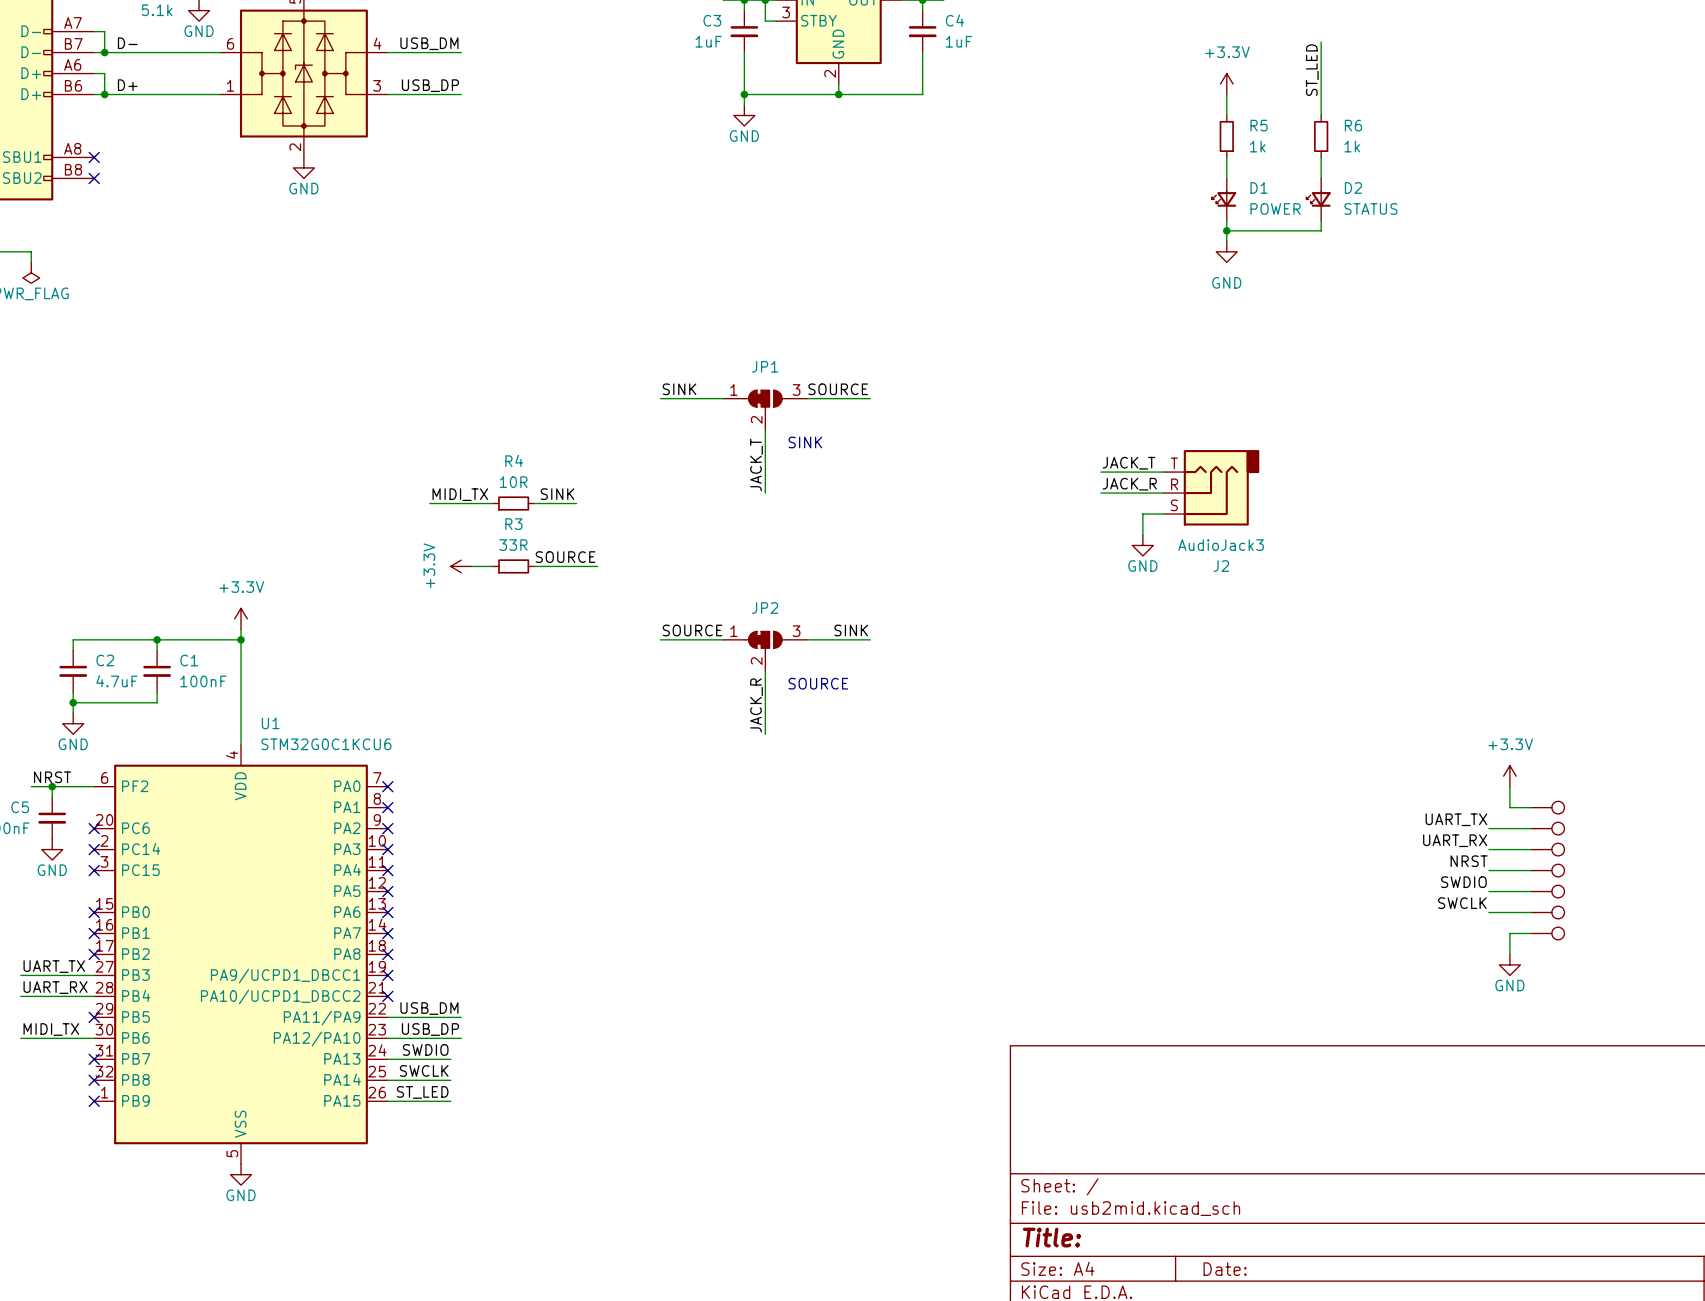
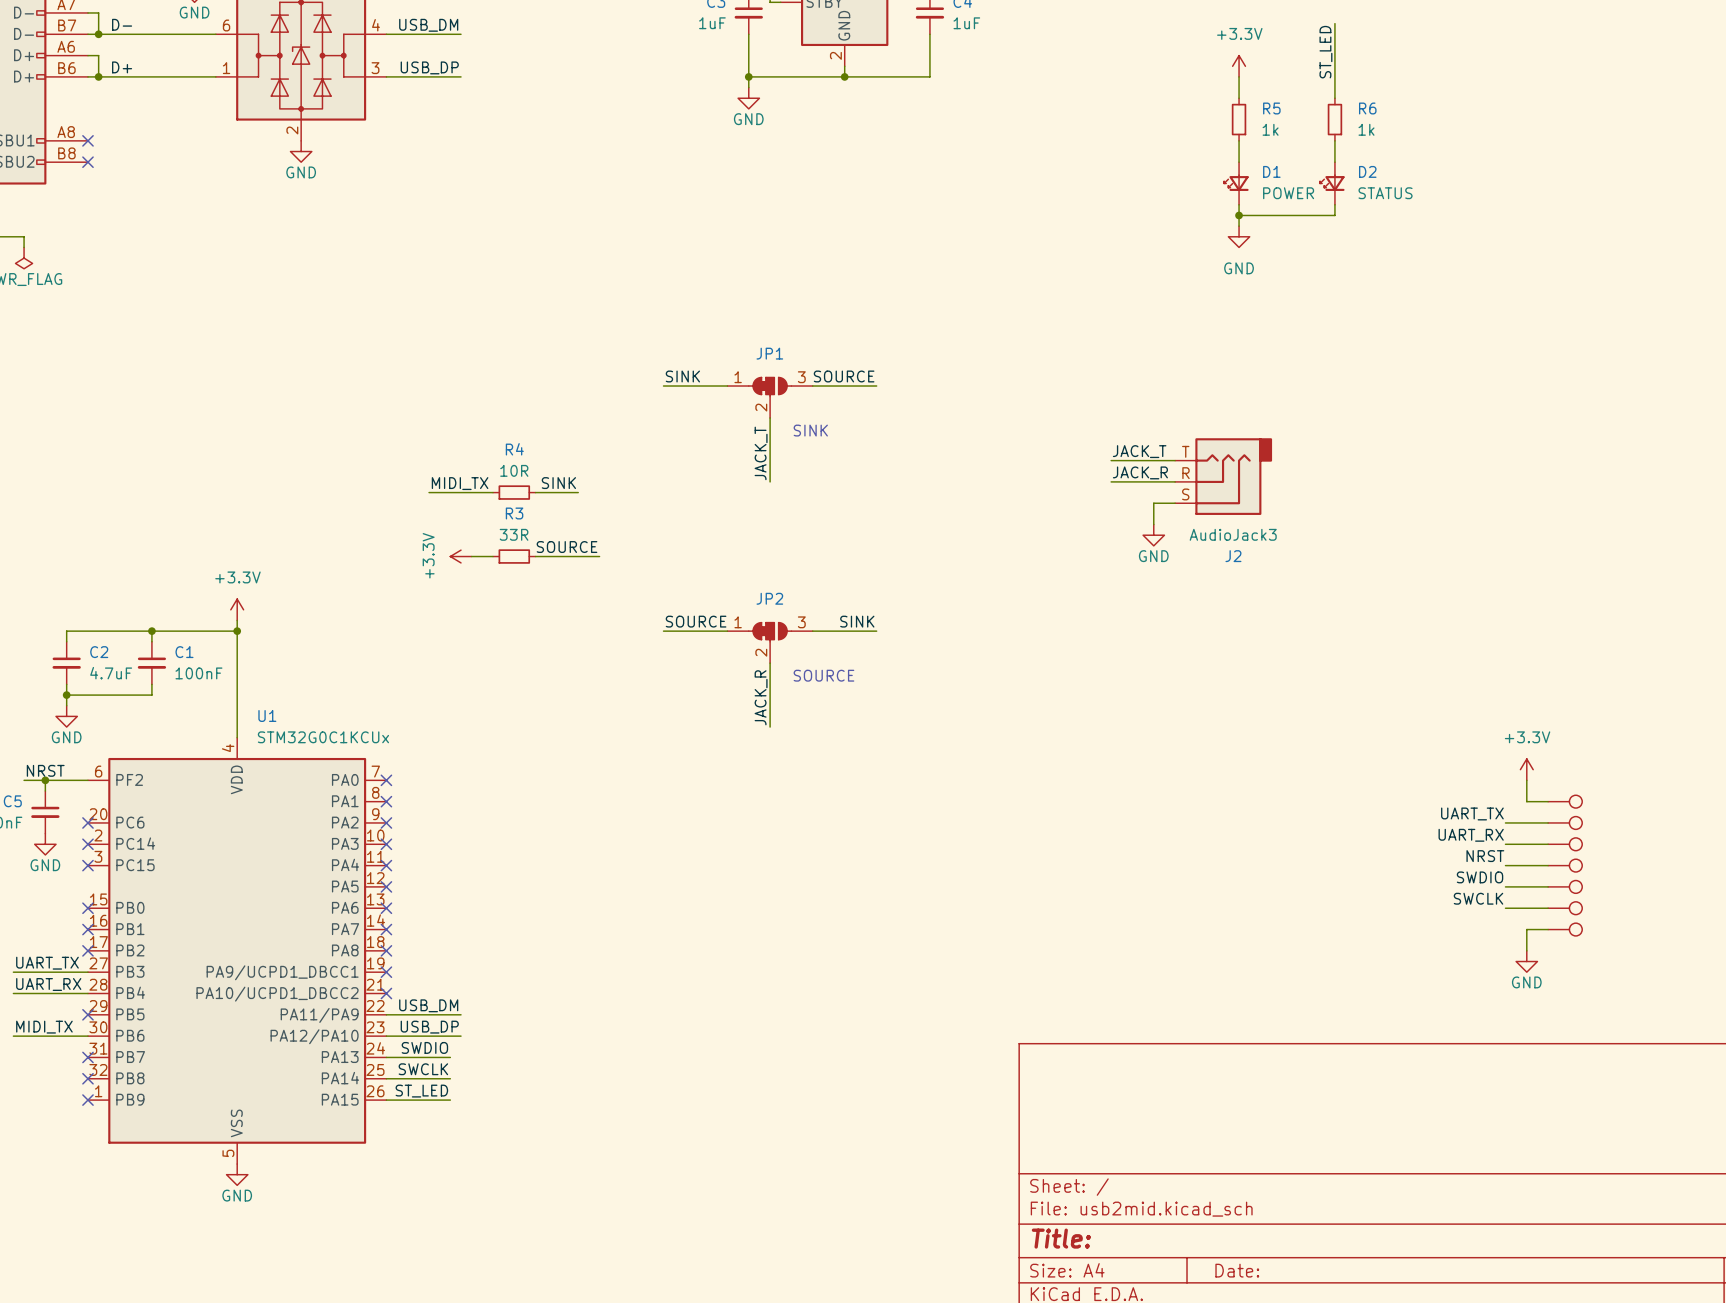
U1 value: STM32G0C1KCU6 (326, 744) -> STM32G0C1KCUx (323, 737)

